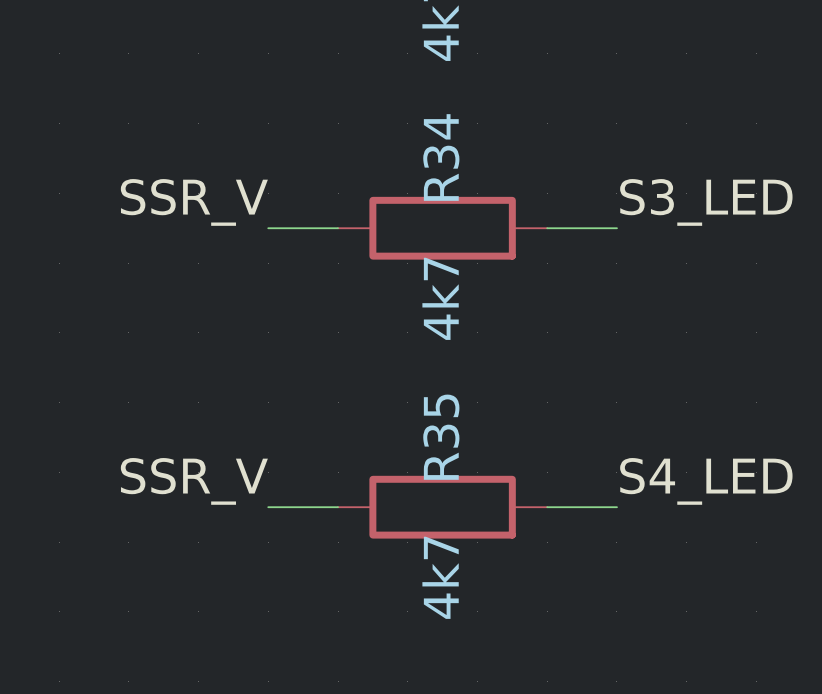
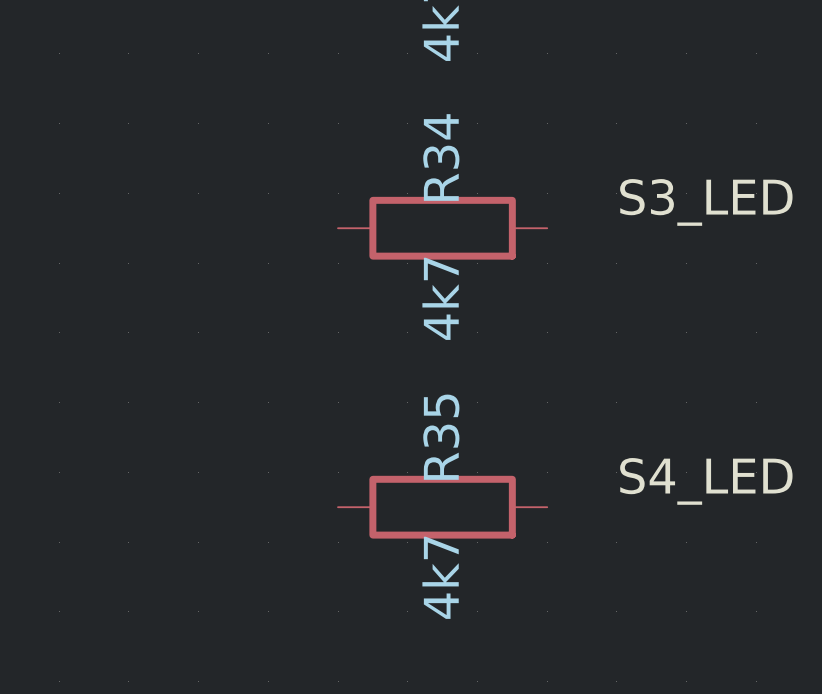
label: SSR_V (194, 202) -> none
wire: (268, 228) (338, 228) -> none
wire: (547, 228) (616, 228) -> none
label: SSR_V (194, 481) -> none
wire: (268, 507) (338, 507) -> none
wire: (547, 507) (616, 507) -> none

